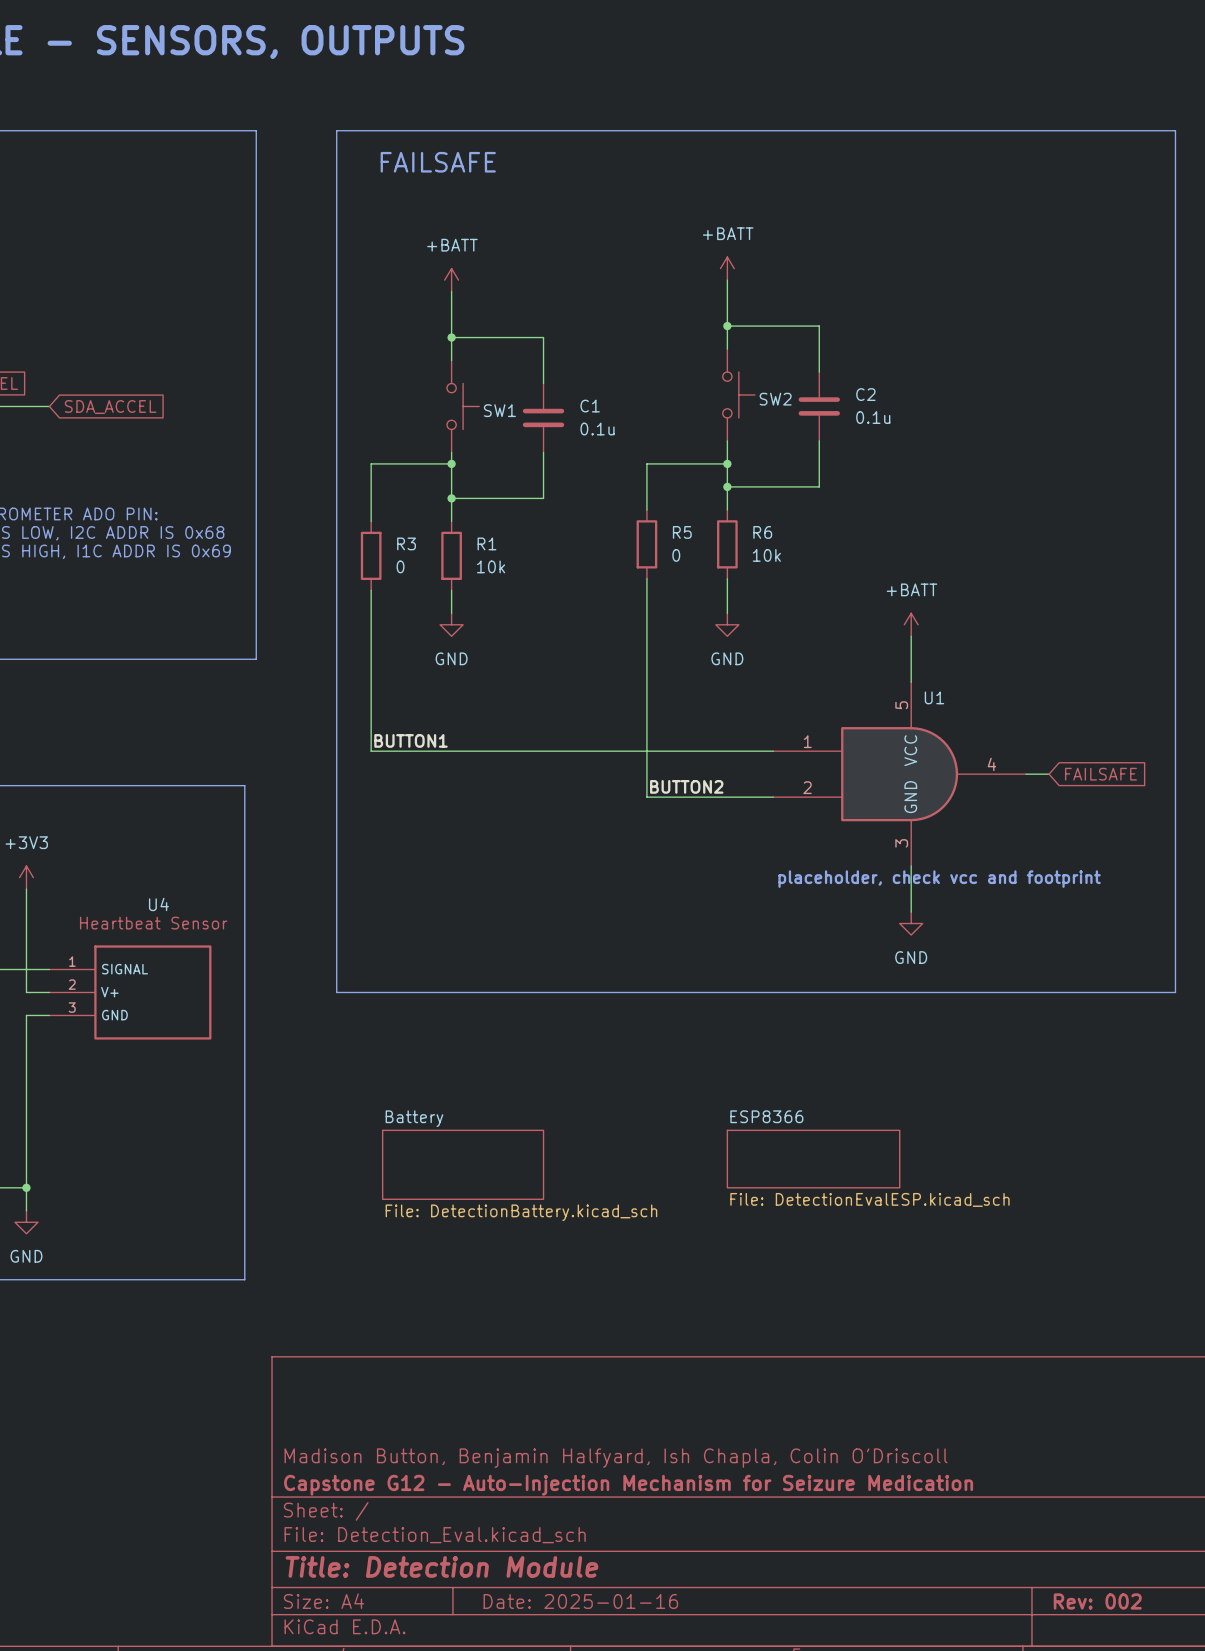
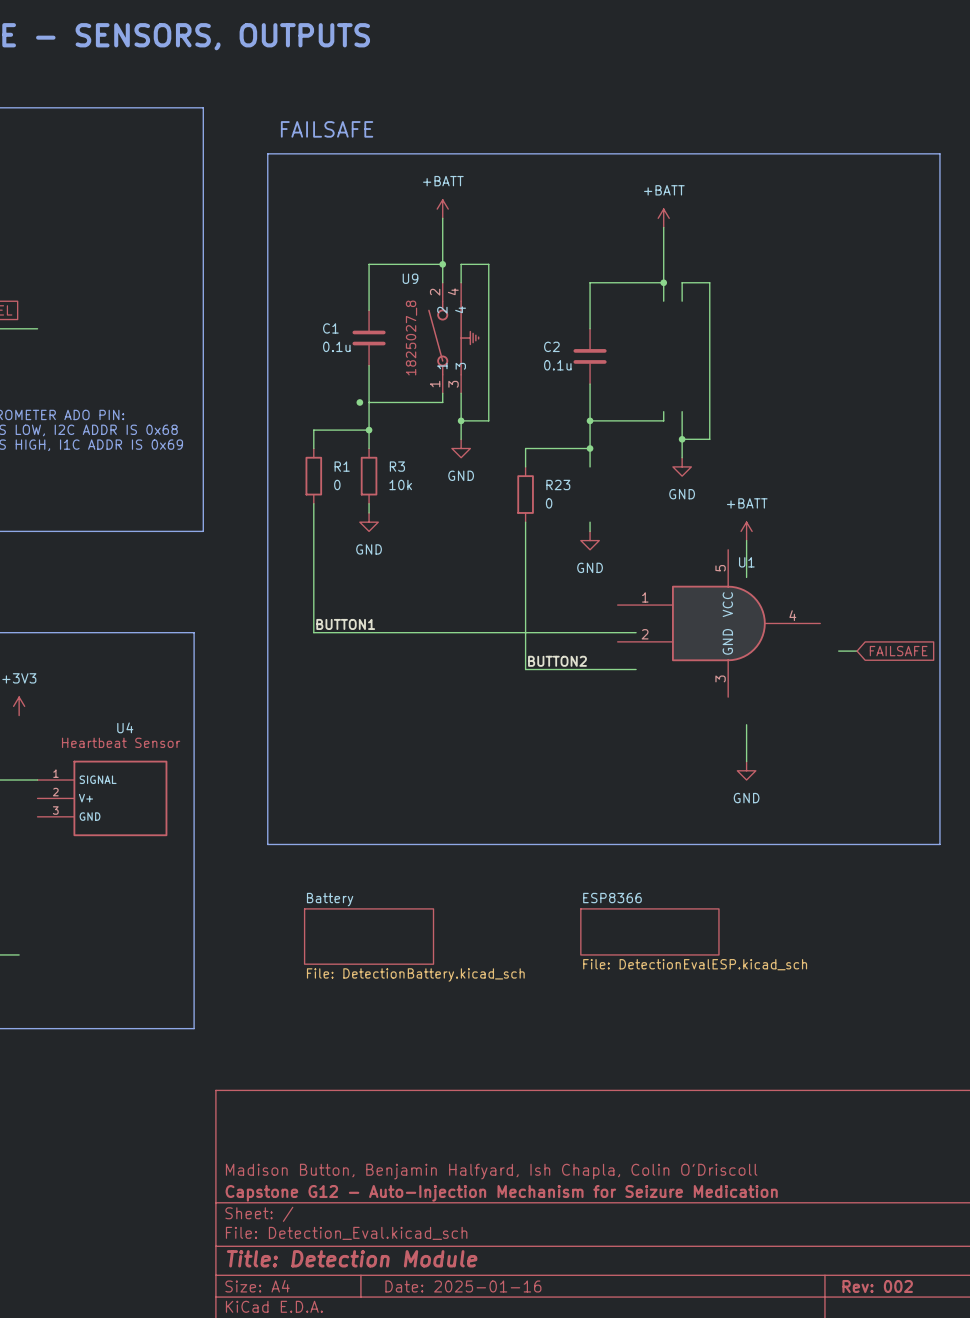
text position: FAILSAFE (438, 162) -> FAILSAFE (327, 129)
line: (336, 188) (336, 130) (1175, 130) (1175, 188) -> (267, 153) (939, 153)
power symbol: none -> +BATT (442, 209)
wire: none -> (442, 218) (442, 282)
power symbol: +BATT (727, 268) -> none
power symbol: none -> +BATT (663, 218)
power symbol: +BATT (451, 280) -> none
wire: (727, 280) (727, 349) -> none
wire: none -> (663, 227) (663, 301)
wire: (451, 291) (451, 360) -> none
wire: none -> (442, 264) (369, 264) (369, 310)
junction: none -> (442, 264)
wire: (727, 326) (819, 326) (819, 372) -> none
junction: (727, 326) -> none
wire: (451, 337) (543, 337) (543, 383) -> none
junction: (451, 337) -> none
wire: none -> (461, 282) (461, 264) (488, 264) (488, 420) (461, 420)
wire: none -> (663, 282) (590, 282) (590, 328)
junction: none -> (663, 282)
wire: none -> (682, 301) (682, 282) (709, 282) (709, 439) (682, 439)
SW2: (738, 394) -> none
C2 name position: C2 (865, 394) -> C2 (551, 346)
SW1: (463, 406) -> none
C1 name position: C1 (590, 406) -> C1 (330, 328)
C2 position: (819, 406) -> (590, 356)
global label: SDA_ACCEL (110, 407) -> none
C1 position: (543, 417) -> (369, 338)
U9: none -> (453, 338)
C2 value position: 0.1u (873, 417) -> 0.1u (557, 365)
C1 value position: 0.1u (597, 429) -> 0.1u (336, 346)
wire: (727, 440) (727, 509) -> none
wire: (819, 440) (819, 486) (727, 486) -> none
wire: (451, 452) (451, 521) -> none
wire: none -> (369, 365) (369, 448)
wire: (543, 452) (543, 498) -> (442, 393) (442, 402) (433, 402)
wire: (451, 463) (371, 463) (371, 521) -> none
junction: (451, 463) -> none
wire: (727, 463) (646, 463) (646, 509) -> none
junction: (727, 463) -> none
wire: none -> (590, 384) (590, 466)
wire: none -> (461, 393) (461, 439)
junction: (727, 486) -> none
wire: (451, 498) (463, 498) -> none
wire: none -> (663, 411) (663, 420) (590, 420)
wire: none -> (682, 411) (682, 457)
junction: none -> (461, 420)
junction: none -> (590, 420)
wire: none -> (369, 430) (313, 430) (313, 448)
junction: none -> (369, 430)
R5: 0 (646, 544) -> none
R6: 10k (727, 544) -> none
junction: none -> (682, 439)
R3 position: (371, 555) -> (369, 476)
R1 position: (451, 555) -> (313, 476)
power symbol: none -> GND (461, 448)
wire: none -> (590, 448) (525, 448) (525, 466)
junction: none -> (590, 448)
R3 value: 0 (400, 566) -> 10k (400, 485)
R1 value: 10k (491, 566) -> 0 (337, 485)
wire: (646, 578) (646, 797) (773, 797) -> none
wire: (727, 578) (727, 613) -> none
power symbol: none -> GND (682, 466)
wire: (371, 590) (371, 751) (773, 751) -> (313, 503) (313, 632) (636, 632)
wire: (451, 590) (451, 613) -> none
R23: none -> 0 (525, 494)
power symbol position: GND (451, 624) -> GND (369, 522)
wire: none -> (369, 503) (369, 512)
power symbol position: GND (727, 624) -> GND (590, 540)
power symbol position: +BATT (911, 624) -> +BATT (746, 531)
wire: (911, 636) (911, 682) -> (746, 540) (746, 577)
wire: none -> (525, 522) (525, 669) (636, 669)
wire: none -> (590, 522) (590, 531)
label position: BUTTON1 (410, 740) -> BUTTON1 (345, 624)
wire: (1026, 774) (1049, 774) -> (838, 651) (857, 651)
global label position: FAILSAFE (1100, 774) -> FAILSAFE (898, 651)
label position: BUTTON2 (686, 786) -> BUTTON2 (557, 661)
wire: (911, 866) (911, 912) -> (746, 724) (746, 761)
text: placeholder, check vcc and footprint (939, 879) -> none
wire: (26, 889) (26, 992) (49, 992) -> none
power symbol position: GND (911, 923) -> GND (746, 770)
line: (336, 992) (1175, 992) -> (267, 798) (267, 844) (939, 844) (939, 798)
wire: (49, 1015) (26, 1015) (26, 1210) -> none
junction: (26, 1187) -> none
power symbol: GND (26, 1222) -> none

